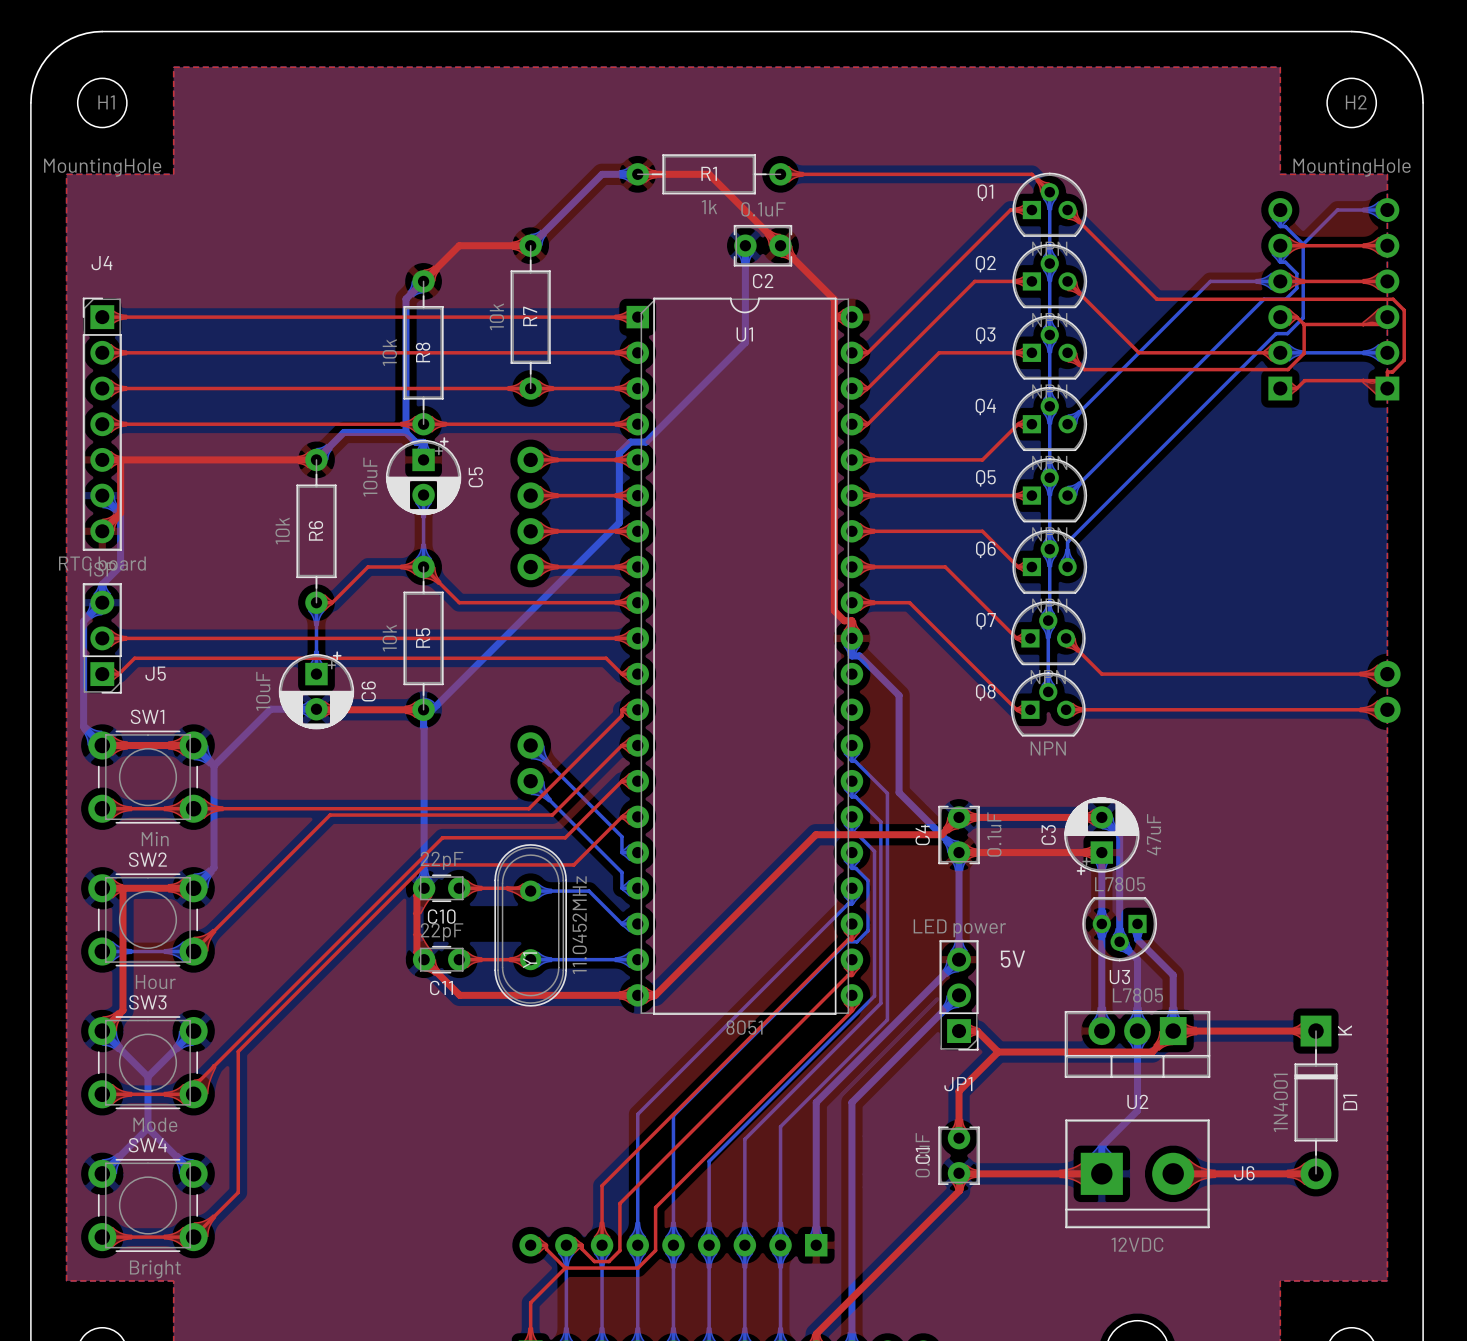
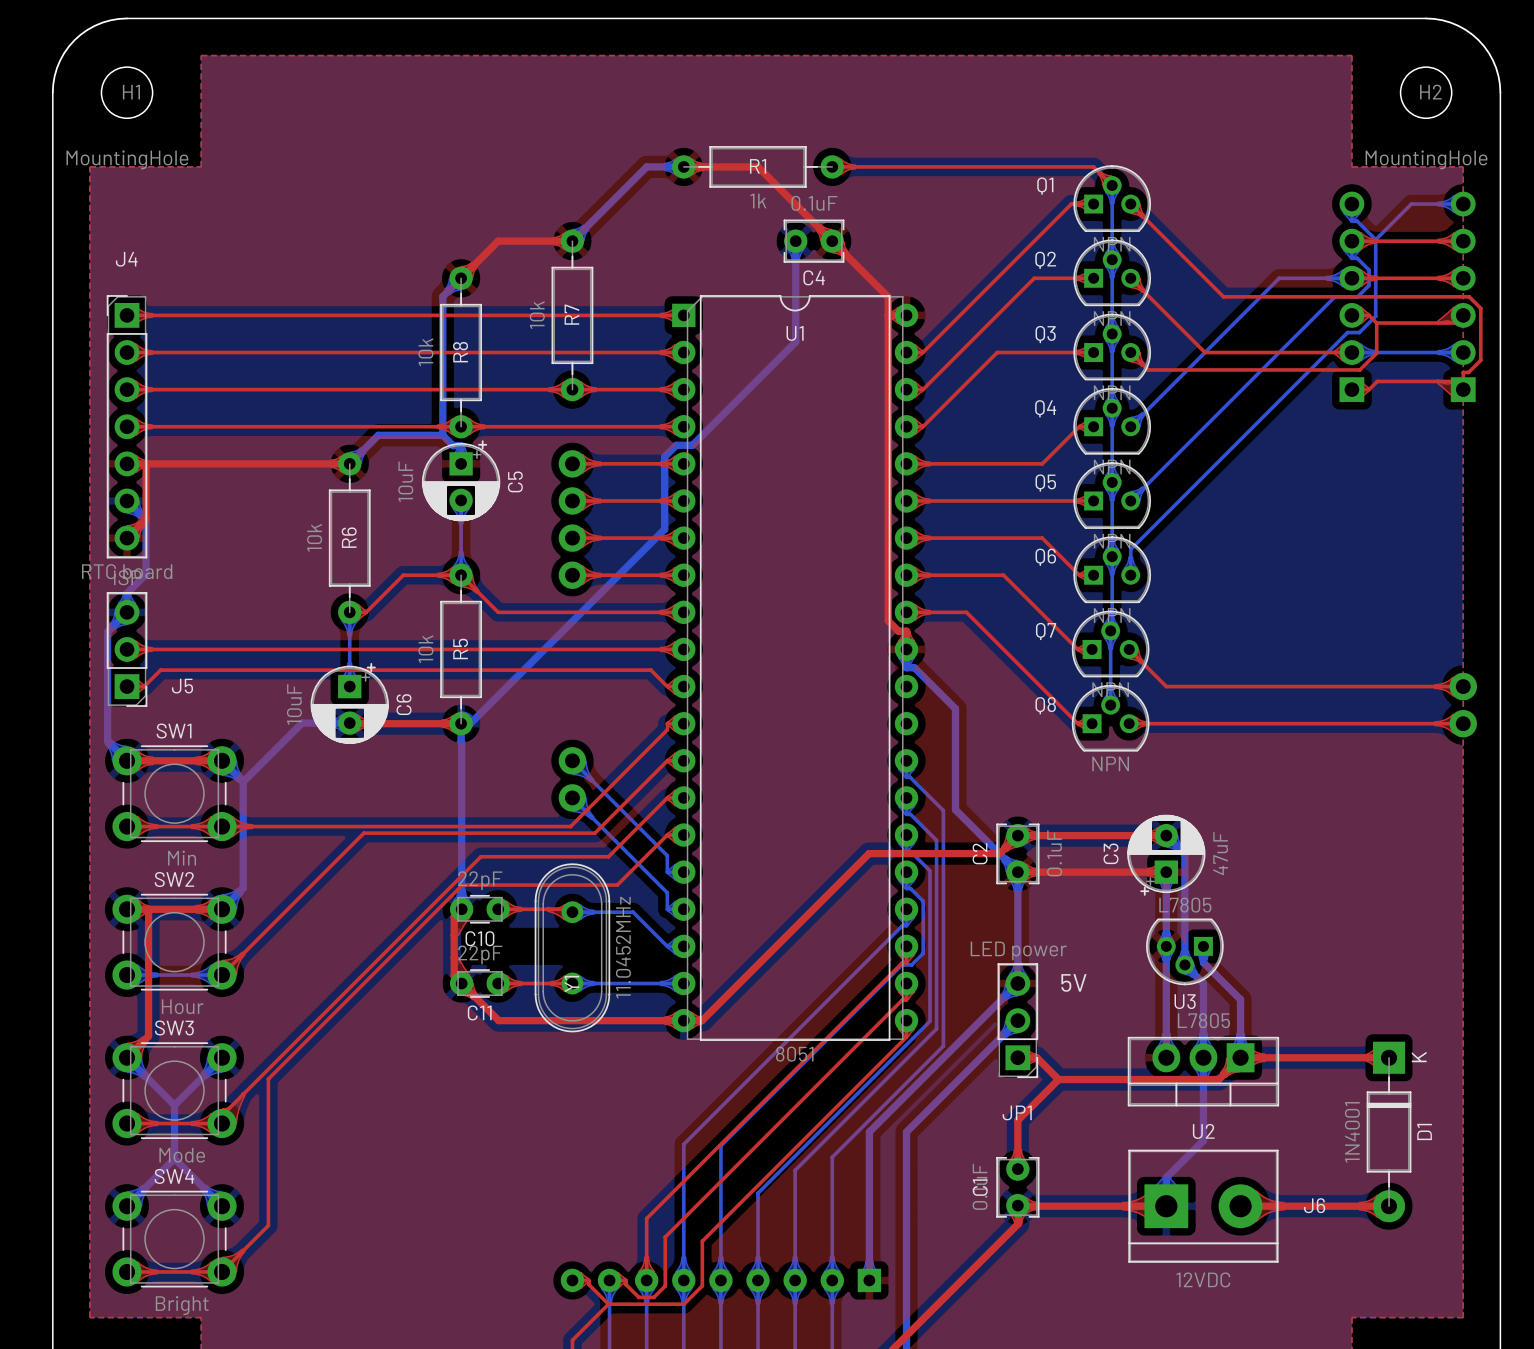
C2 name: C2 (763, 281) -> C4 (814, 277)
C4 name: C4 (922, 834) -> C2 (980, 853)

